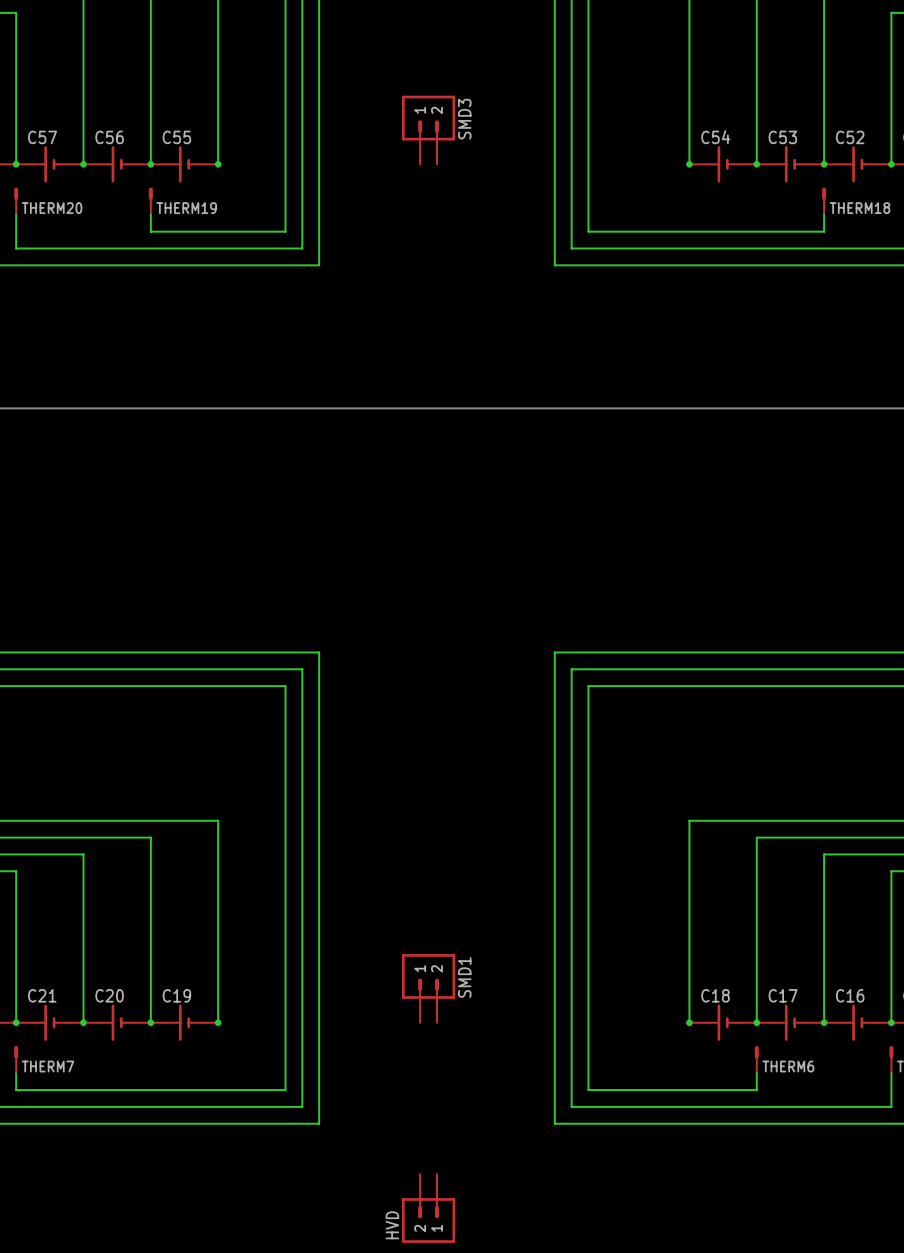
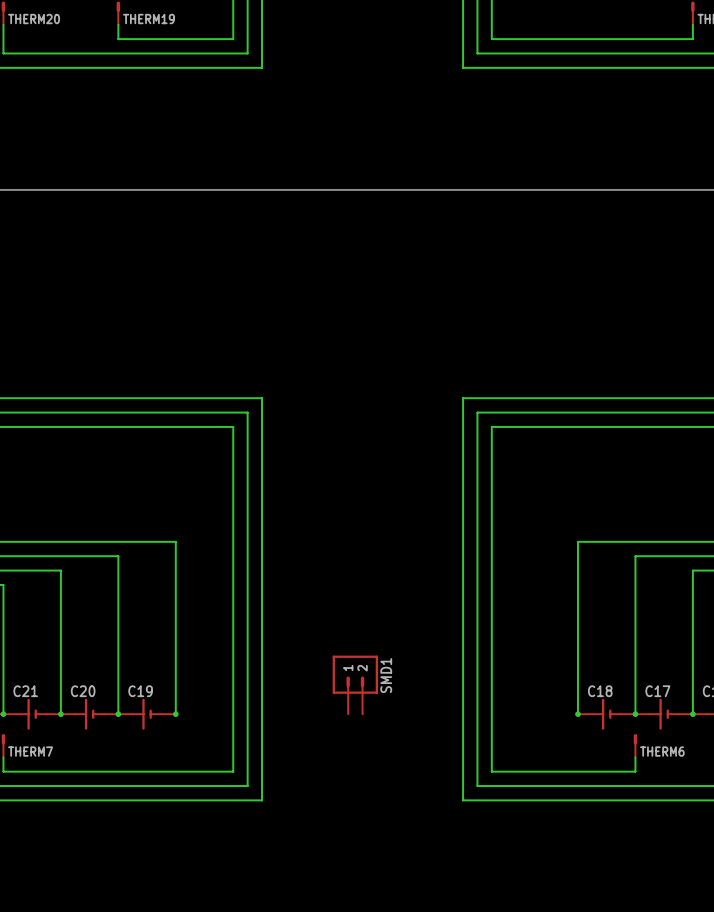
HVD: (428, 1208) -> none

